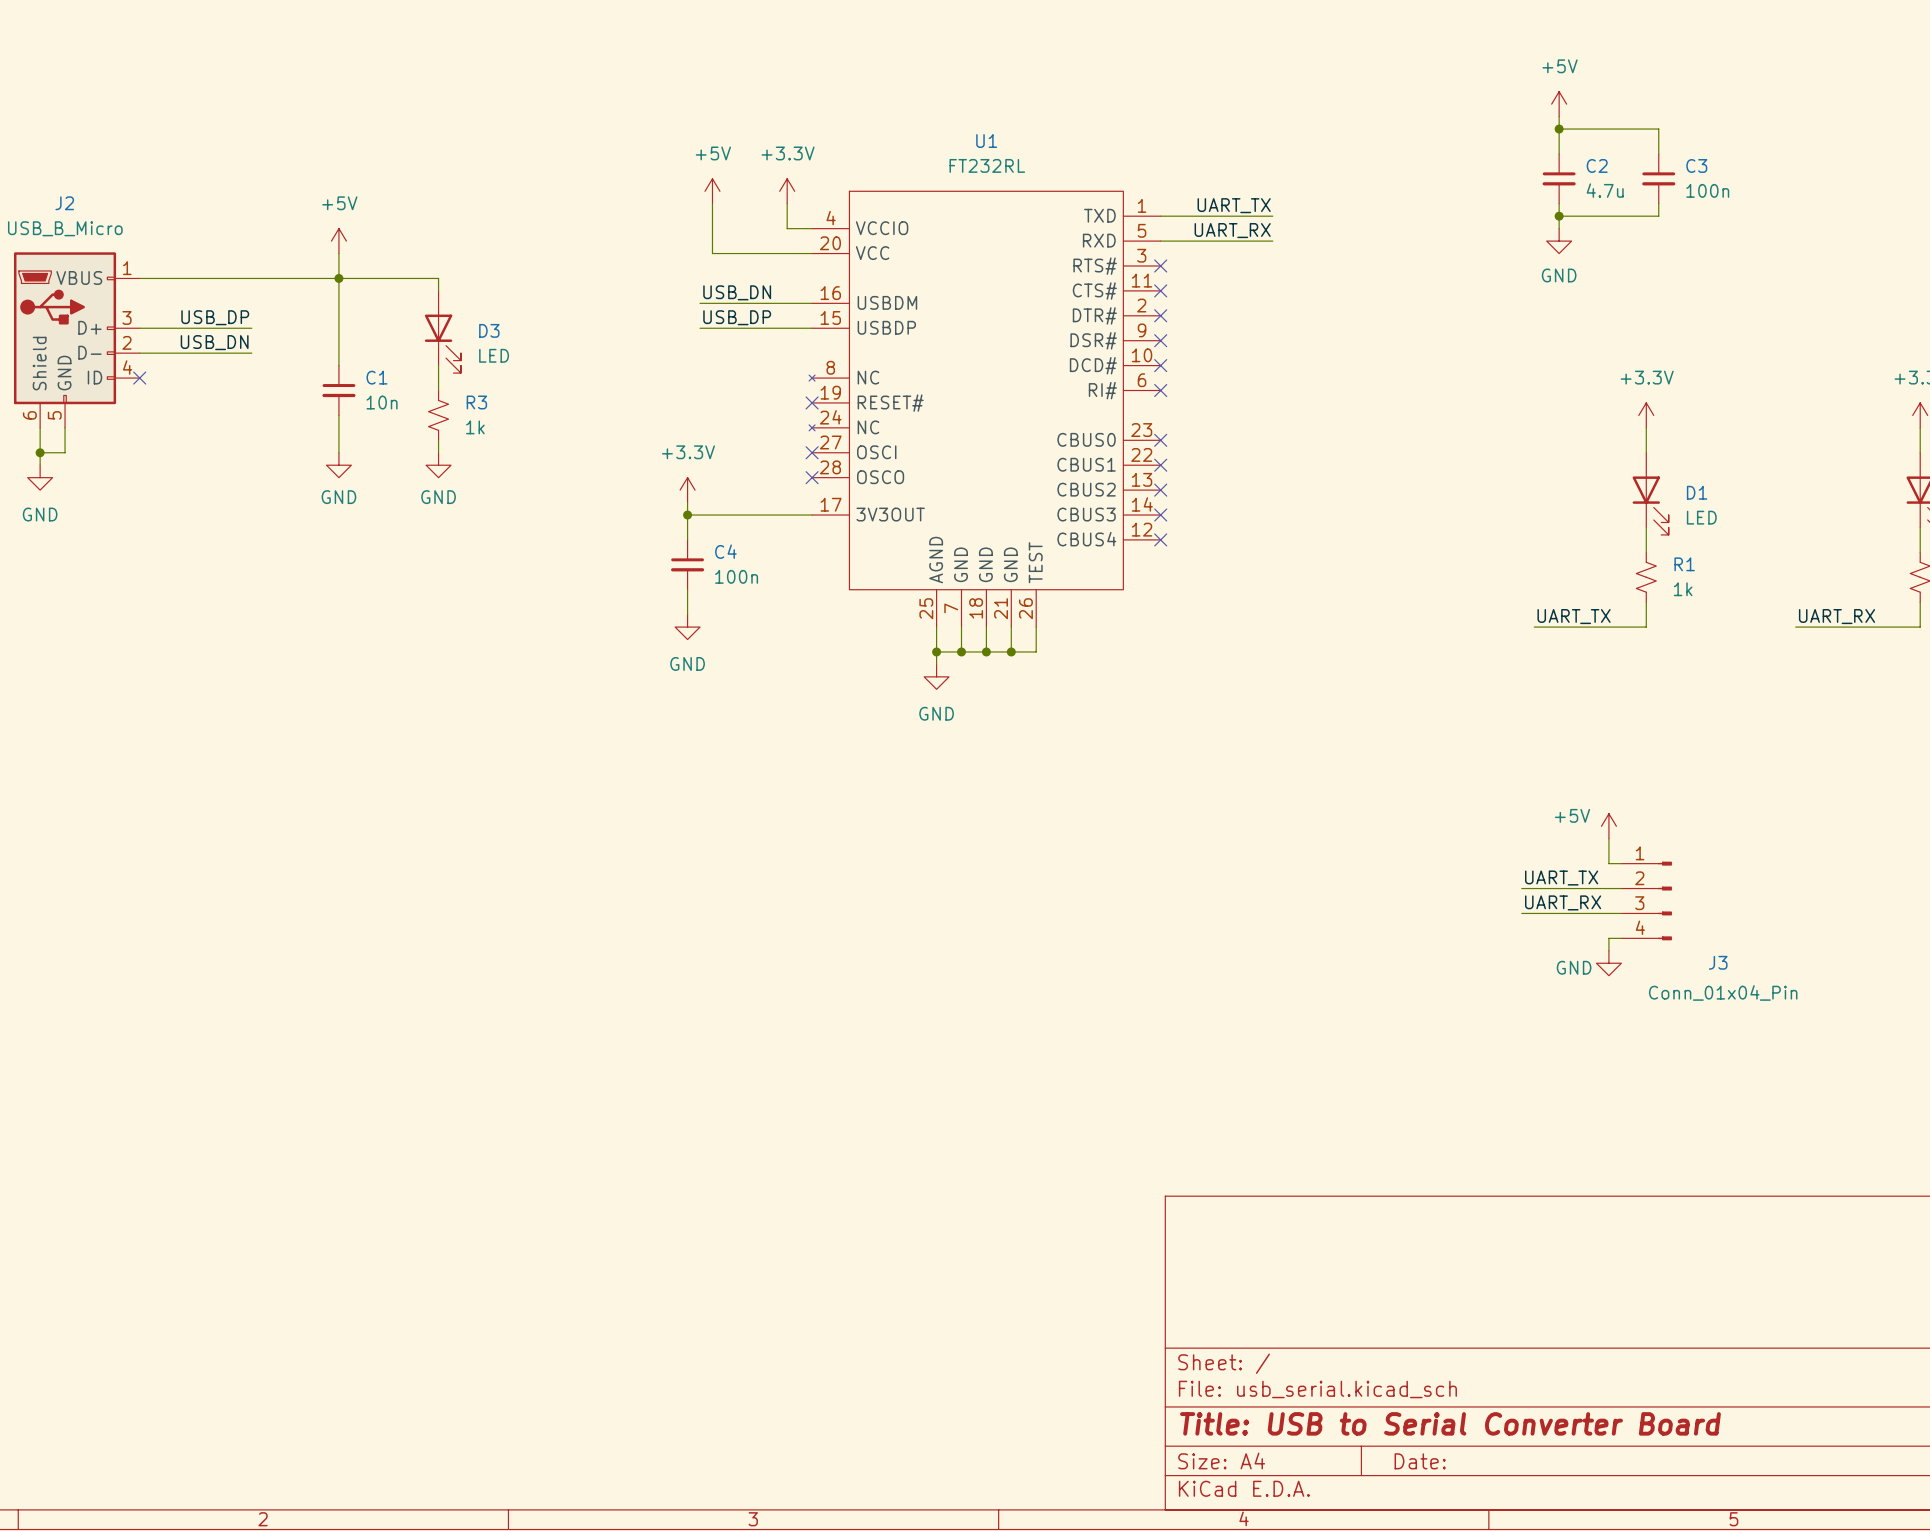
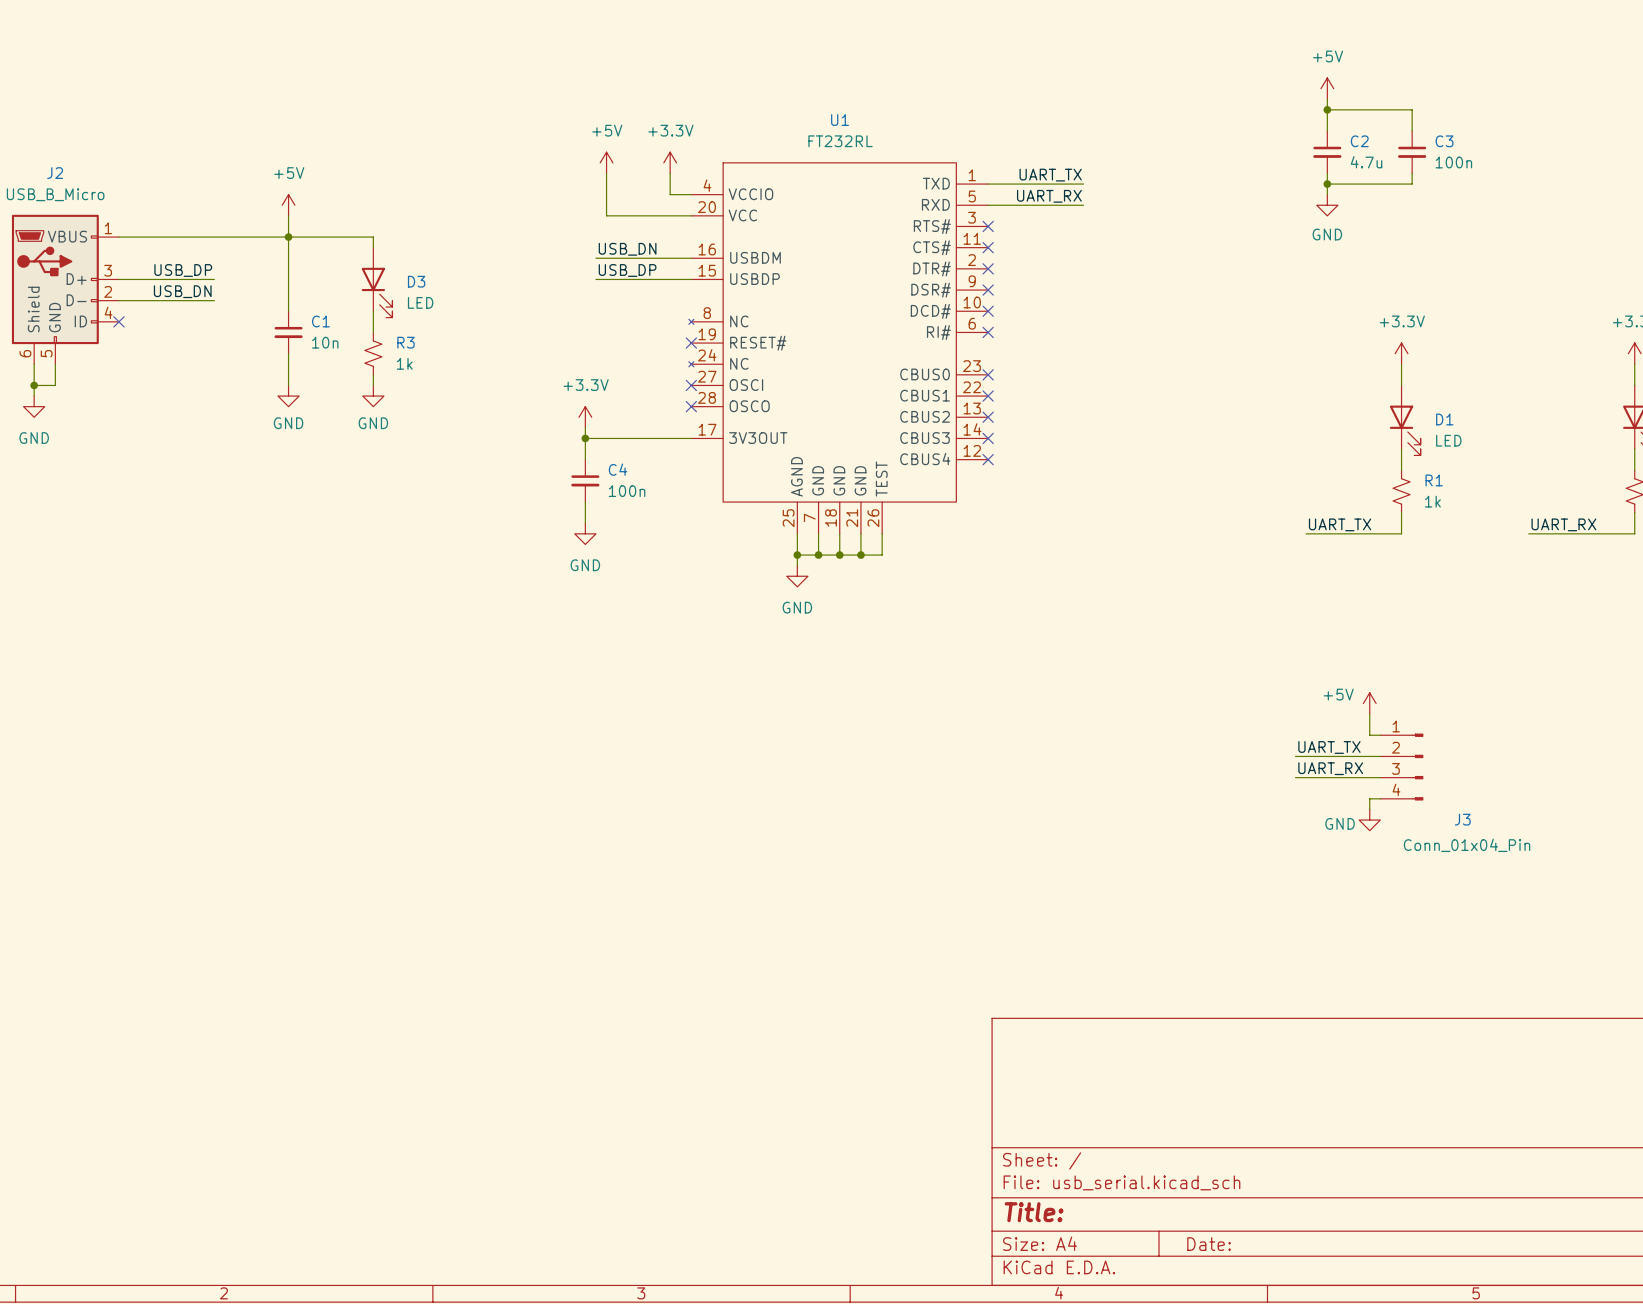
title block: Title: USB to Serial Converter Board (1450, 1423) -> Title: (1034, 1212)

